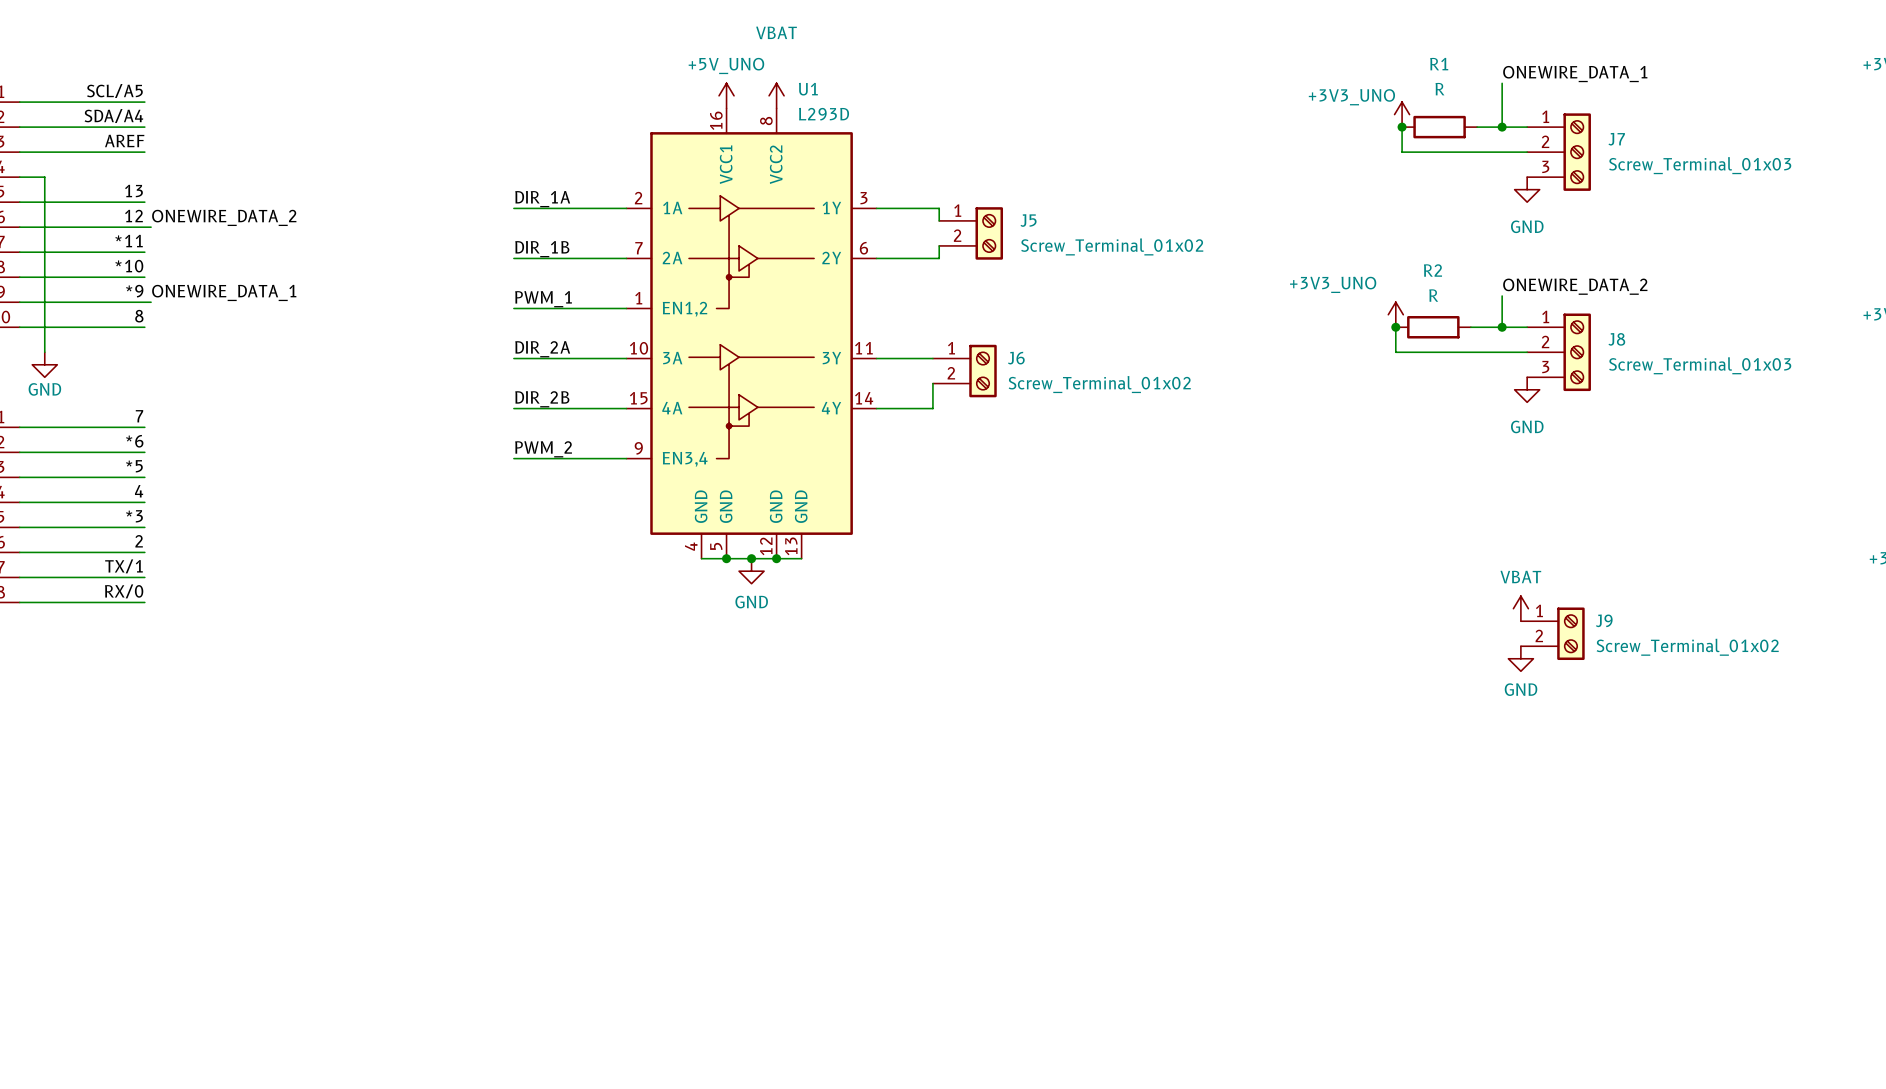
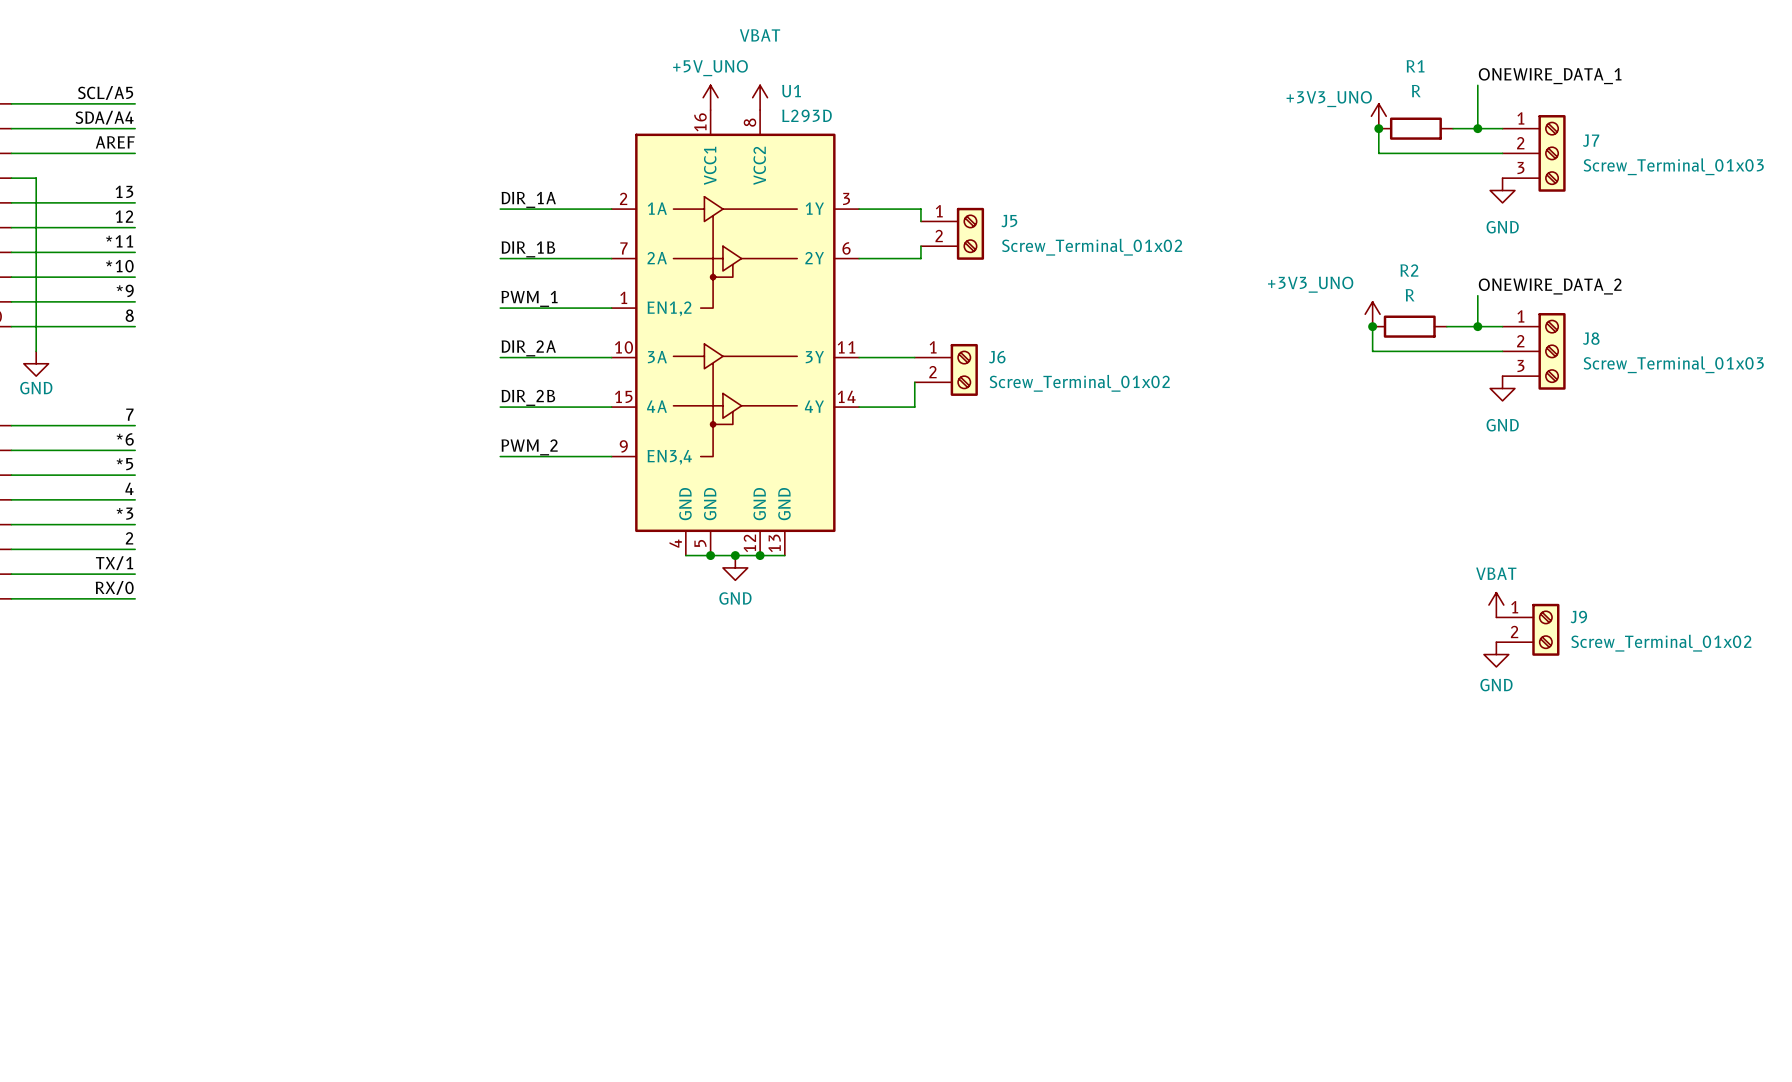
label: ONEWIRE_DATA_2 (224, 217) -> none
wire: (144, 227) (151, 227) -> none
label: ONEWIRE_DATA_1 (224, 292) -> none
wire: (144, 302) (151, 302) -> none

